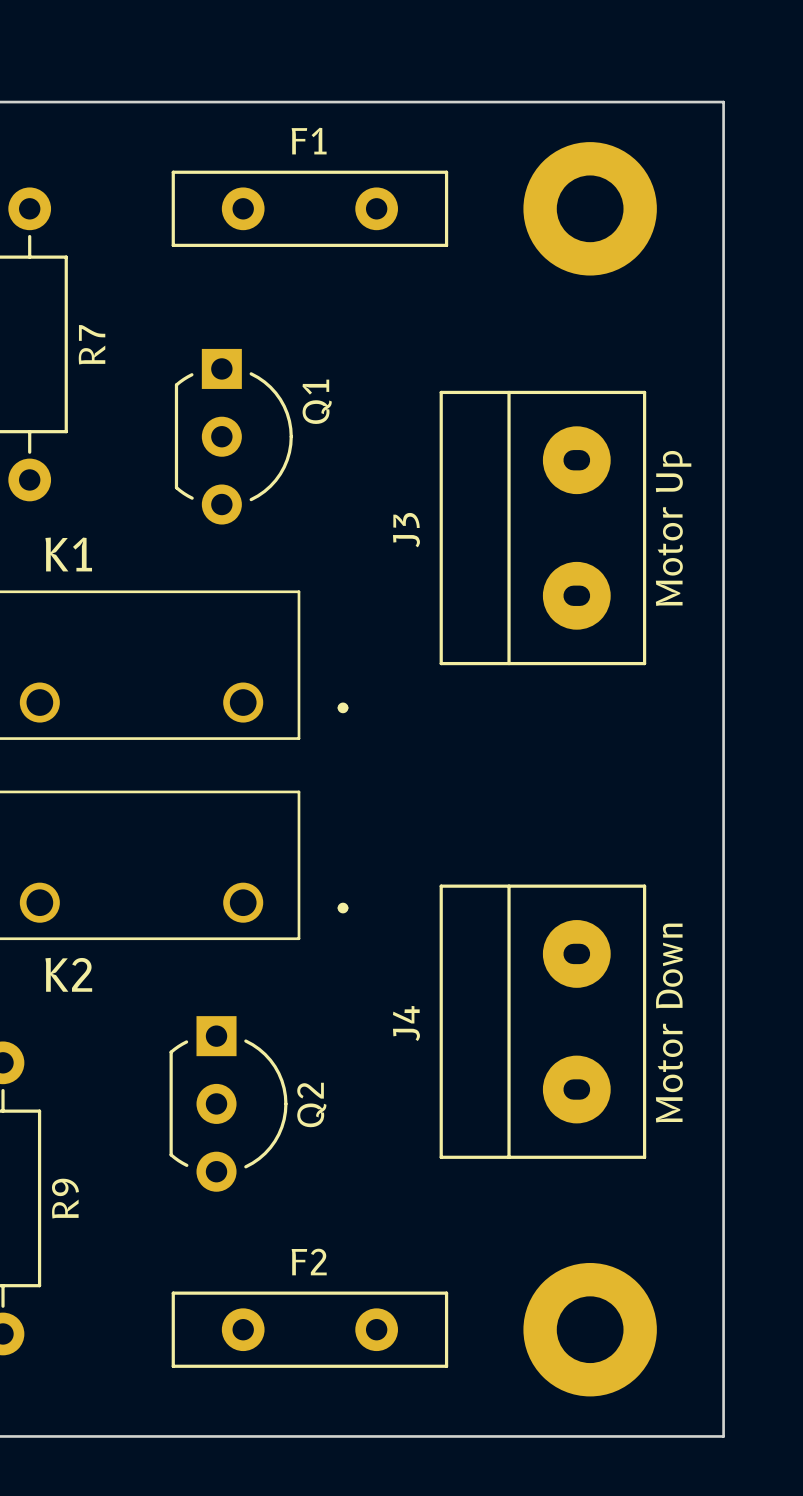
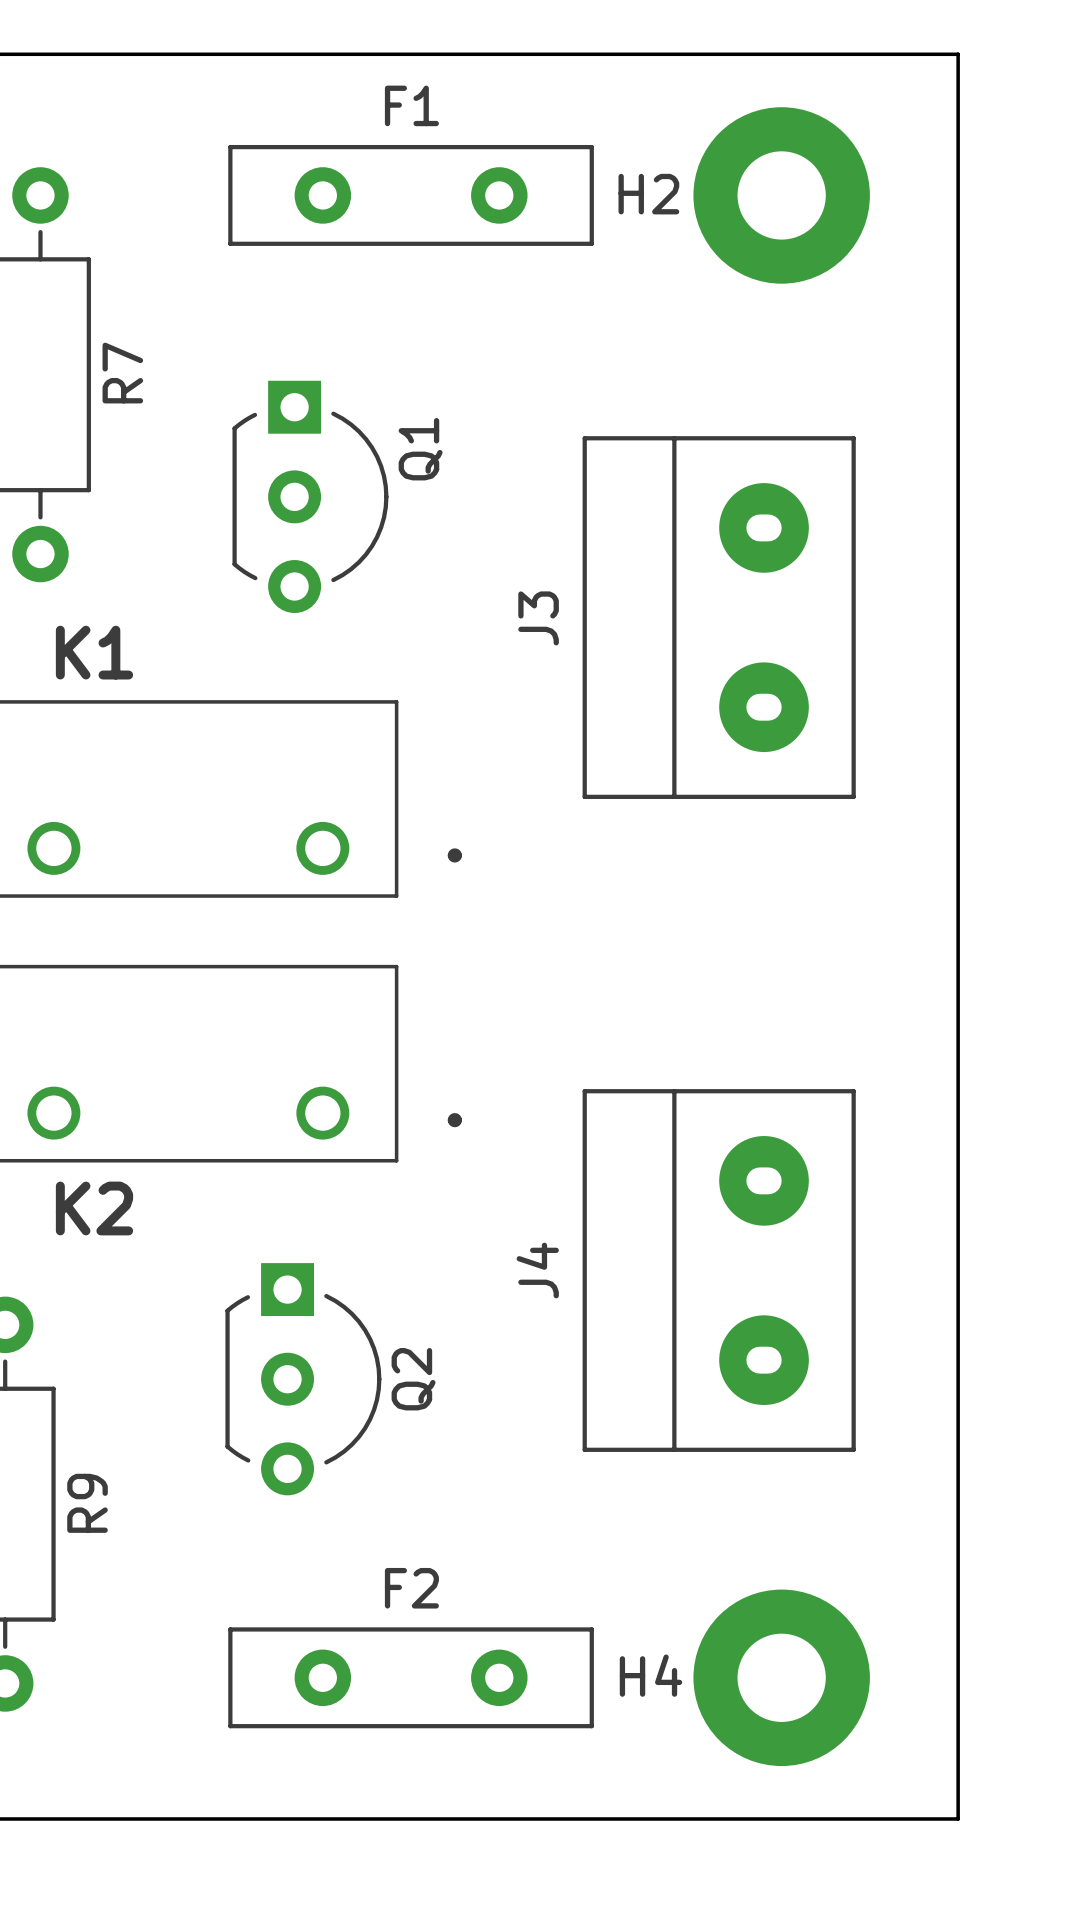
H2 name: none -> H2 (648, 194)
text: Motor Up (673, 528) -> none
text: Motor Down (669, 1023) -> none
H4 name: none -> H4 (650, 1675)

